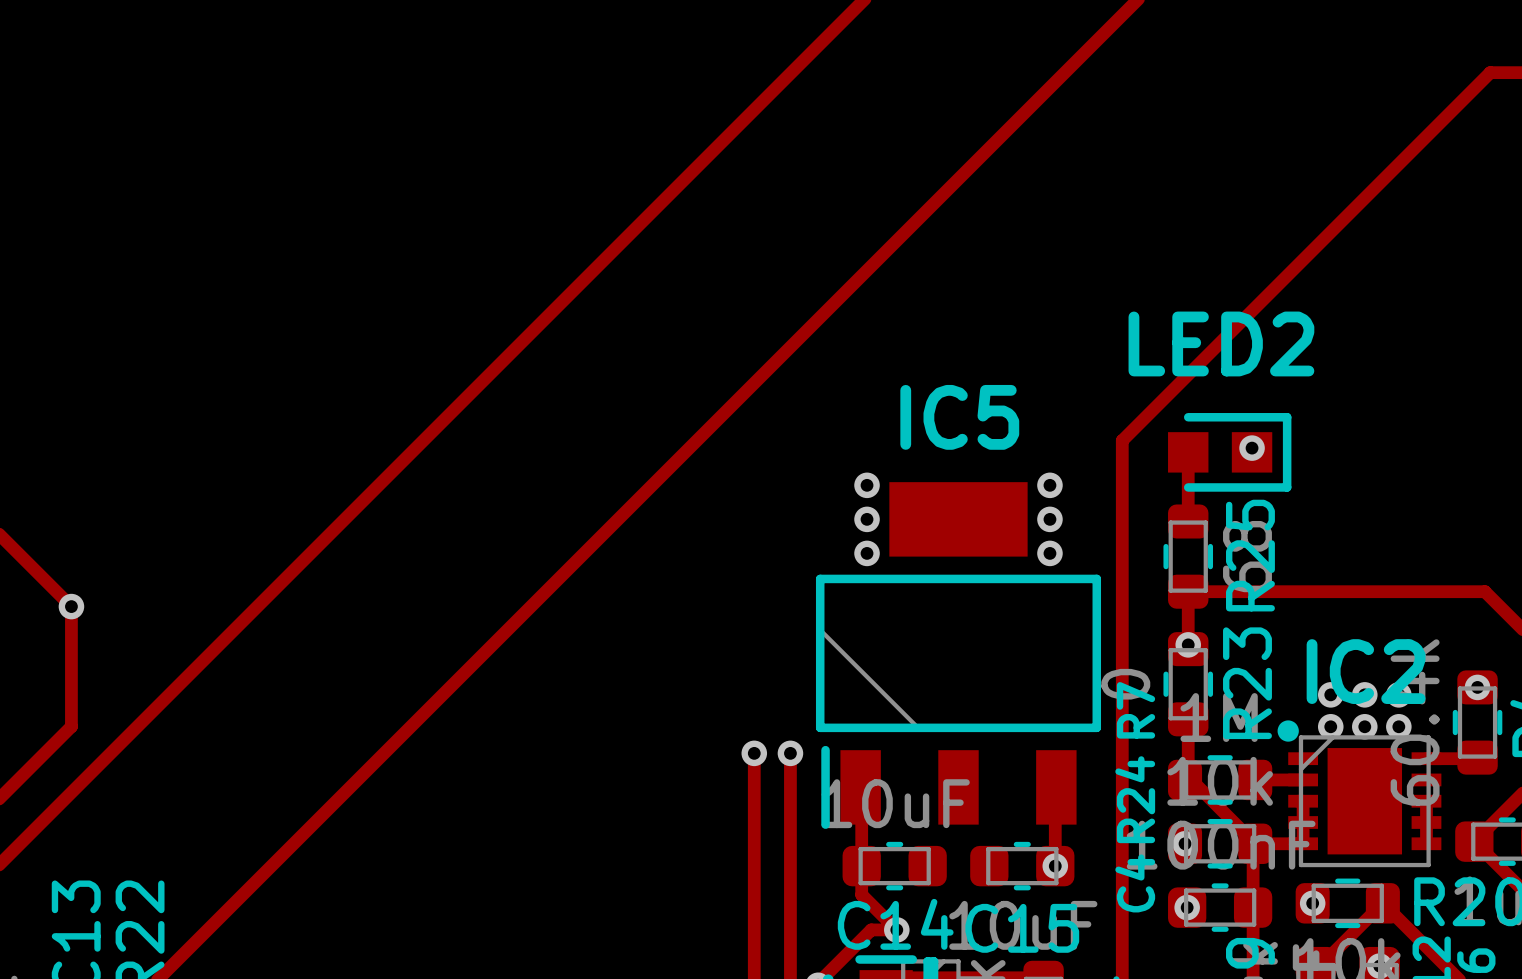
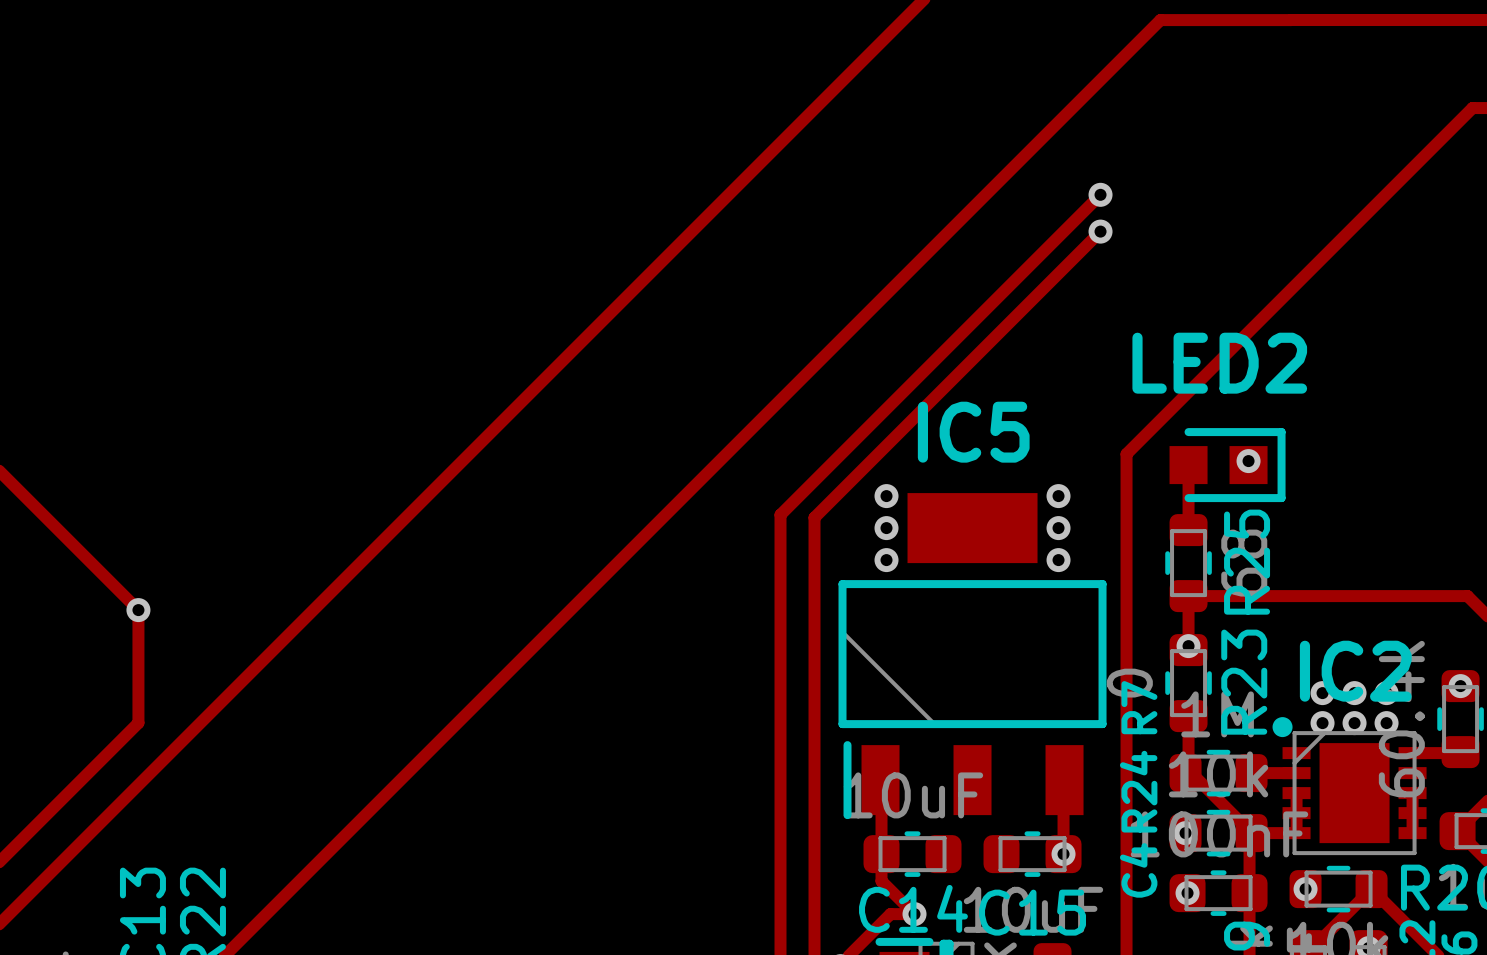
track: none -> (1100, 194) (780, 514) (780, 748)
via: none -> (1100, 194)
track: none -> (1100, 231) (814, 517) (814, 748)
via: none -> (1100, 231)
via: (754, 753) -> none
via: (790, 753) -> none

